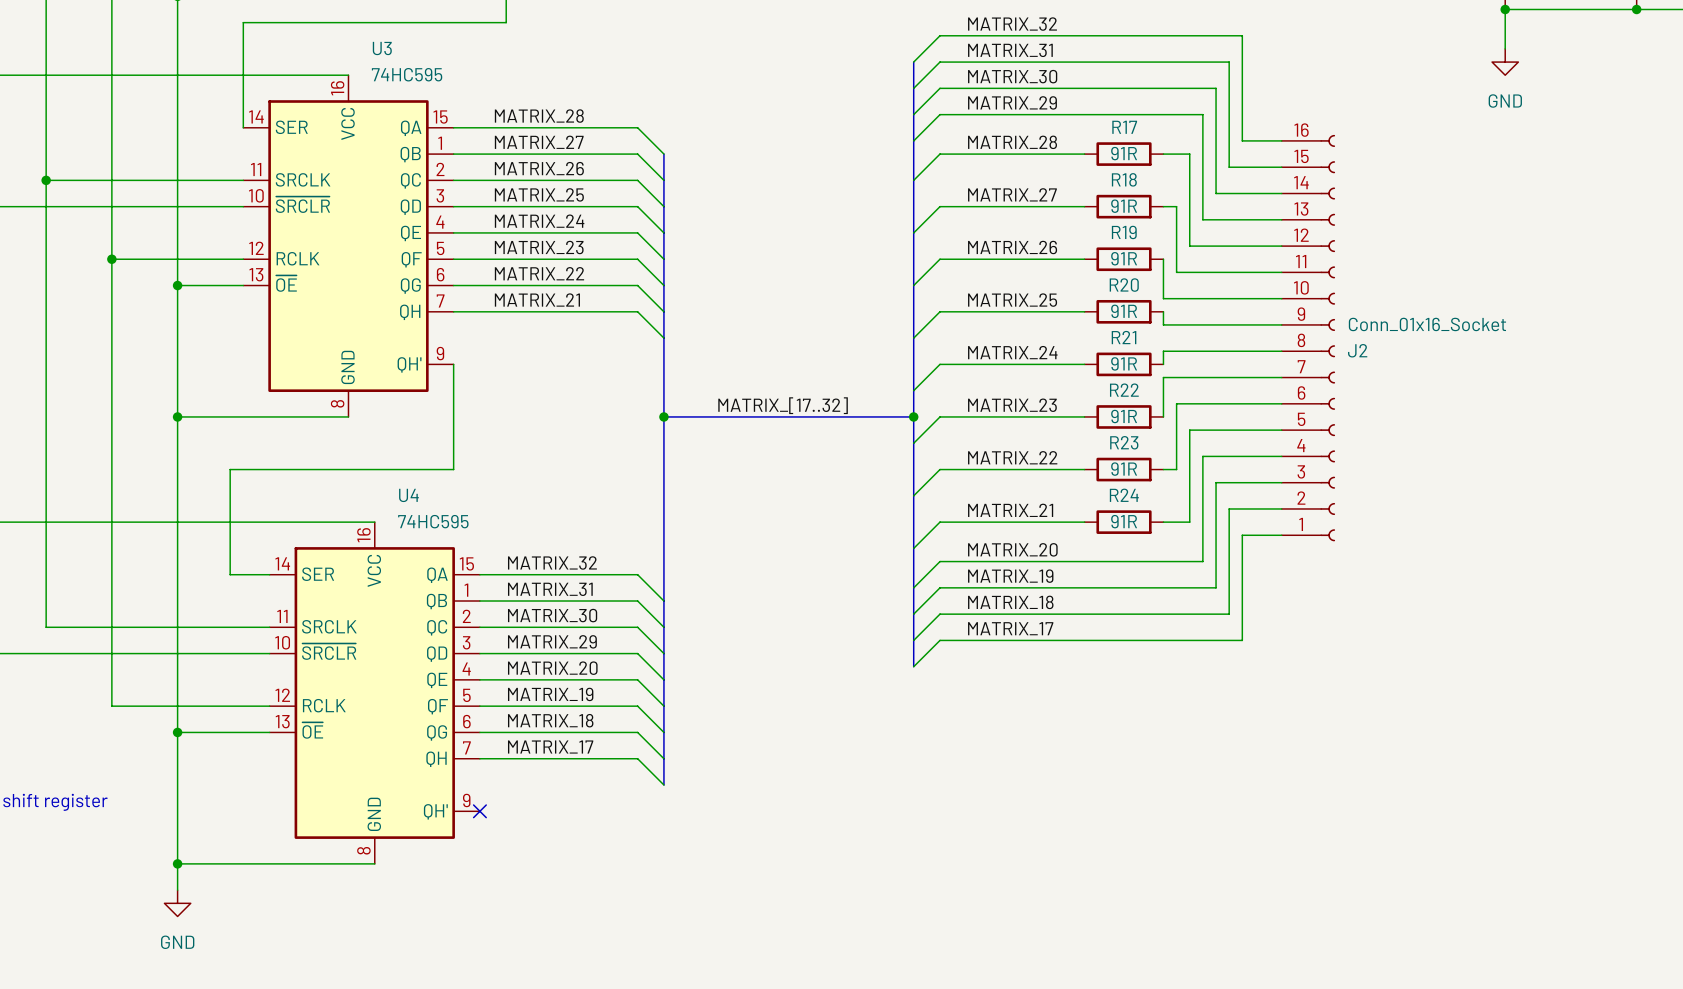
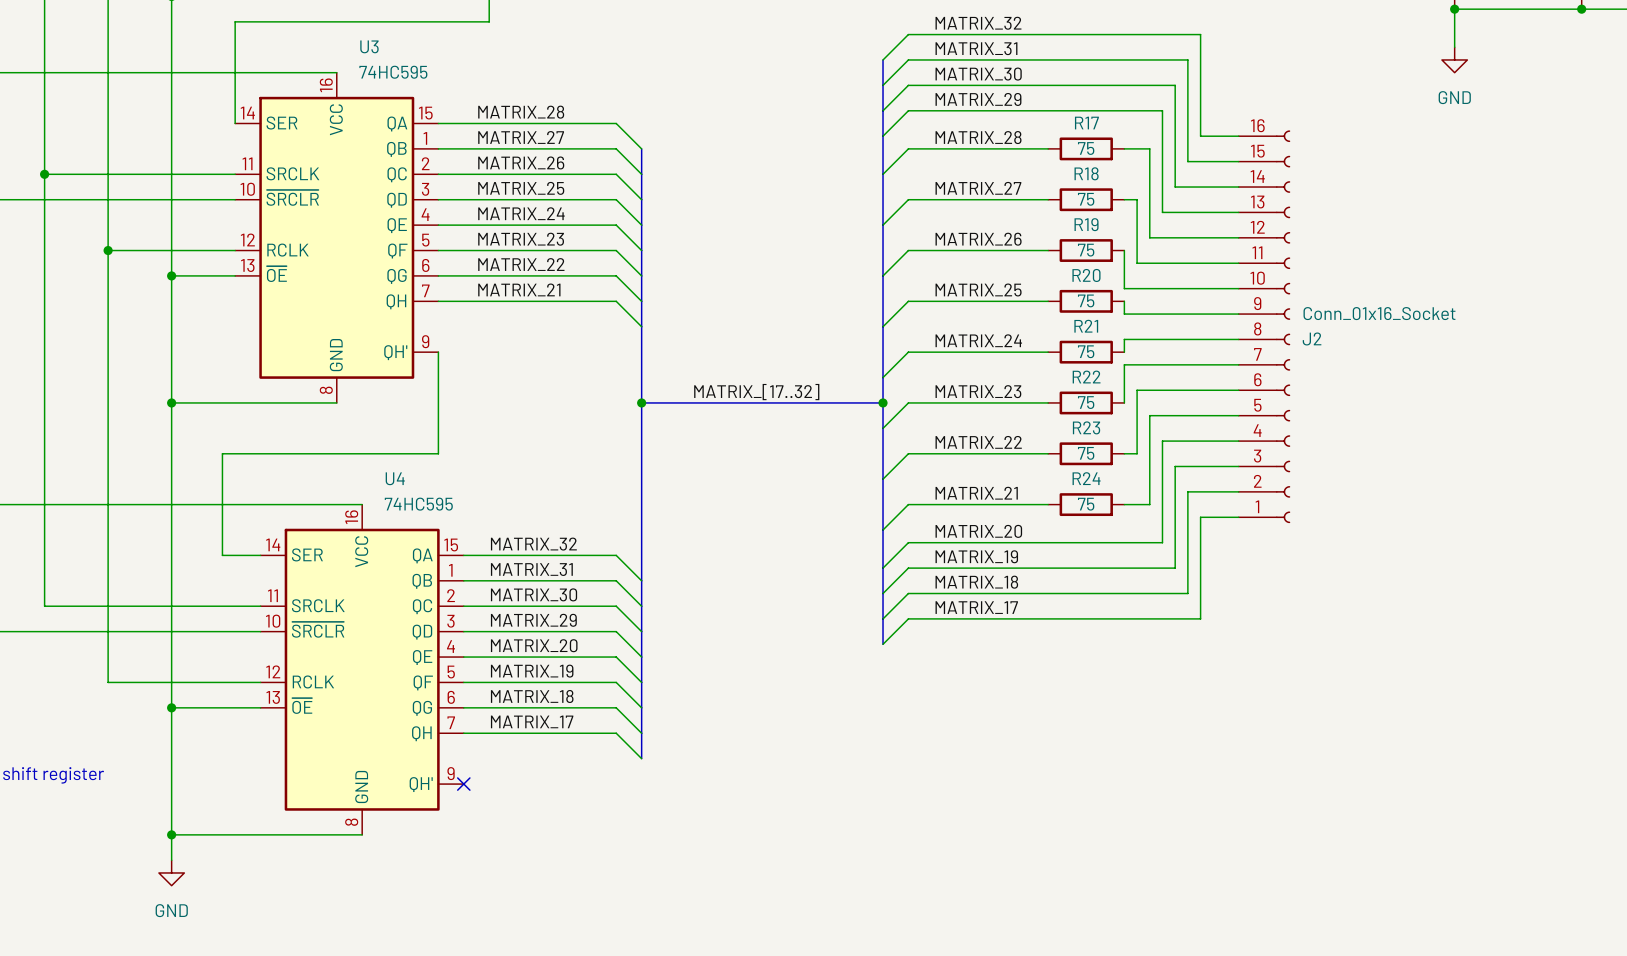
R17 value: 91R (1124, 153) -> 75 (1086, 148)
R18 value: 91R (1124, 206) -> 75 (1086, 199)
R19 value: 91R (1124, 258) -> 75 (1086, 250)
R20 value: 91R (1124, 311) -> 75 (1086, 300)
R21 value: 91R (1124, 363) -> 75 (1086, 351)
R22 value: 91R (1124, 416) -> 75 (1086, 402)
R23 value: 91R (1124, 469) -> 75 (1086, 453)
R24 value: 91R (1124, 521) -> 75 (1086, 504)

